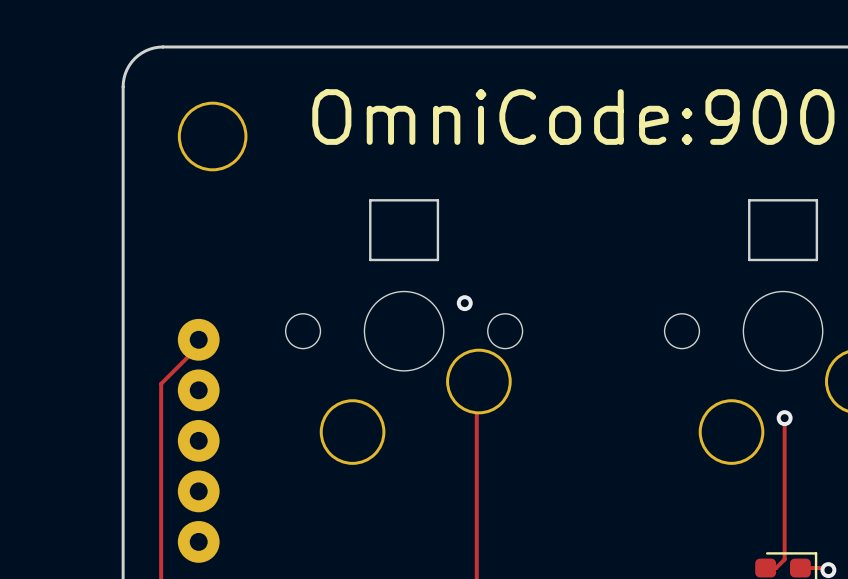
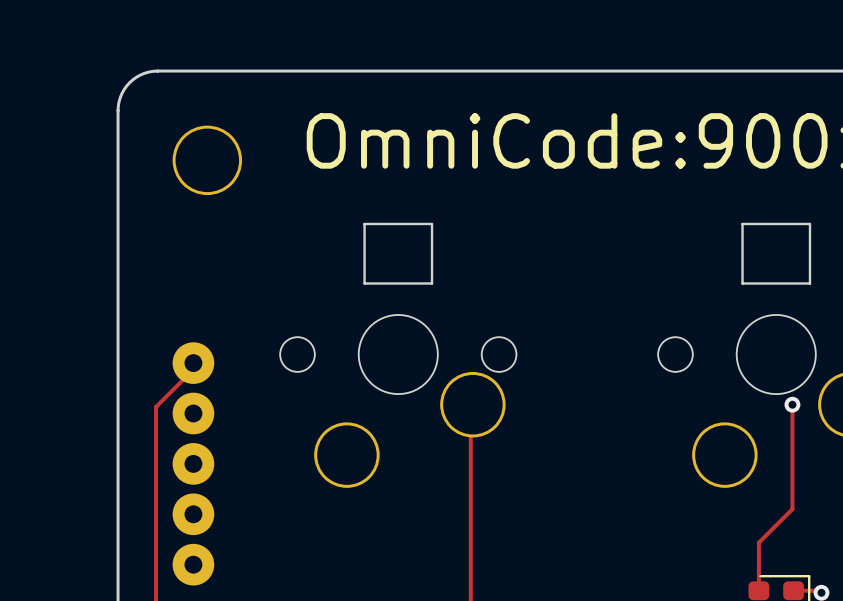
via: (464, 303) -> none
track: (784, 418) (784, 559) (776, 568) (765, 568) -> (792, 404) (792, 509) (758, 542) (758, 590)
via position: (784, 418) -> (792, 404)

